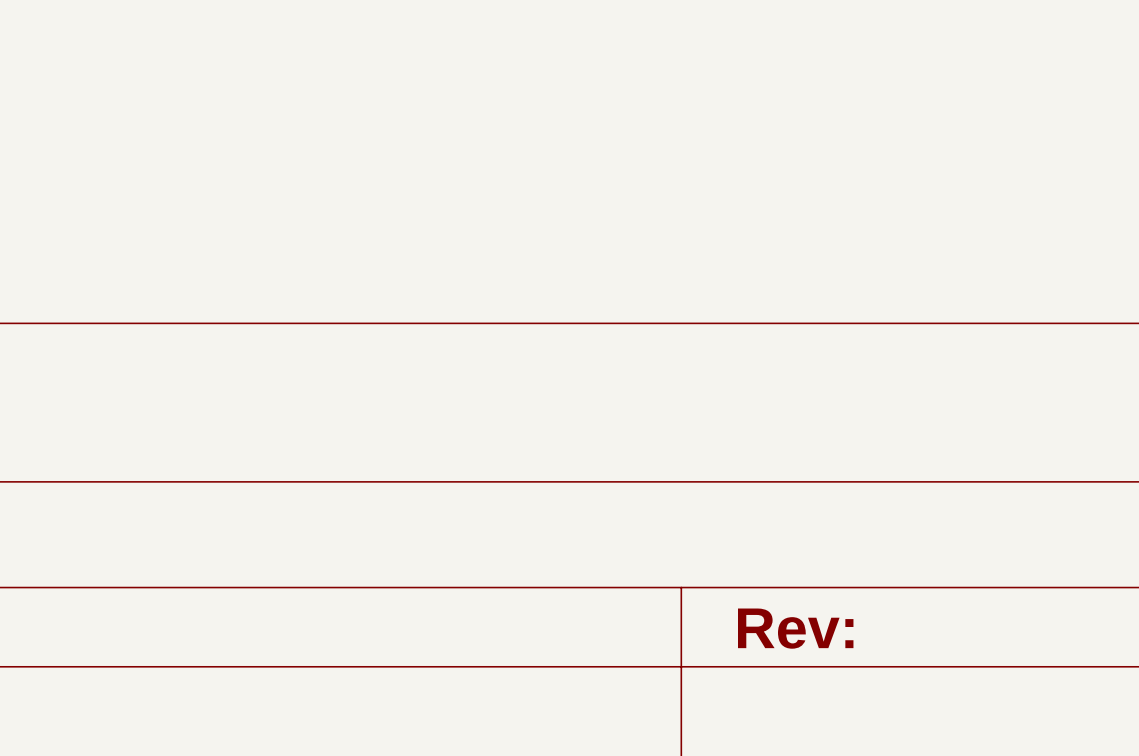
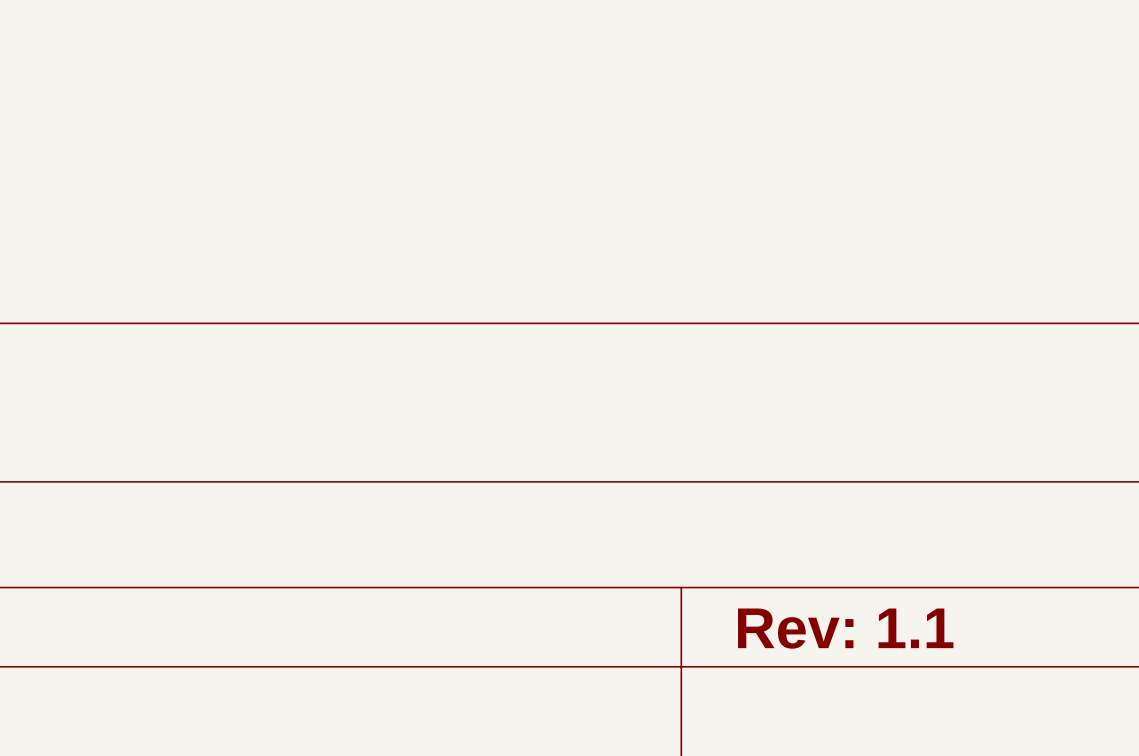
title block: Rev: (795, 628) -> Rev: 1.1 (845, 628)

